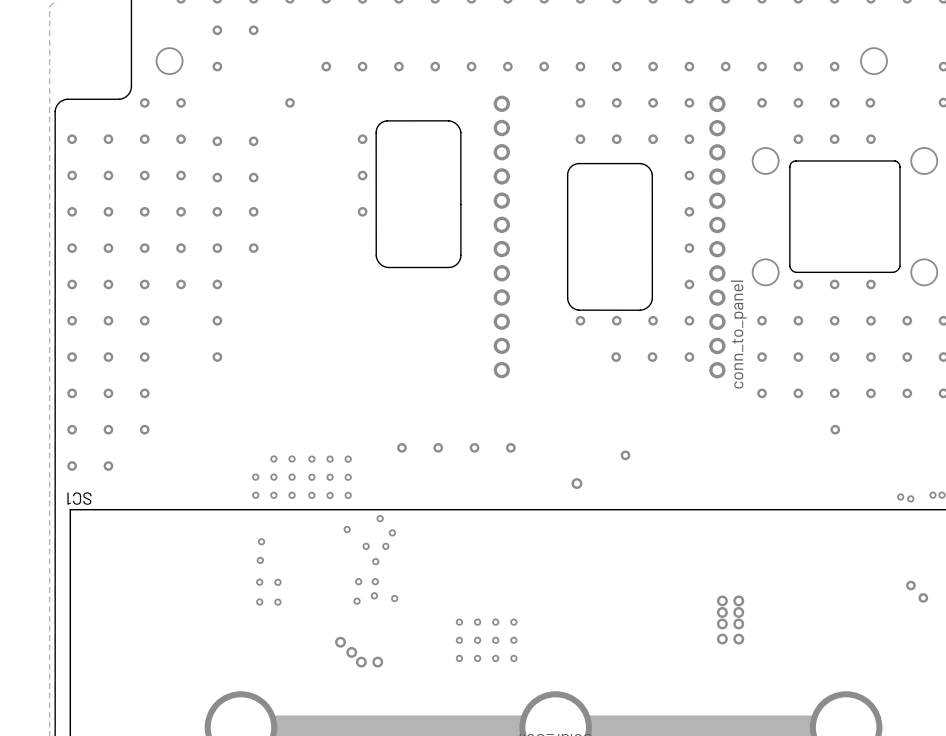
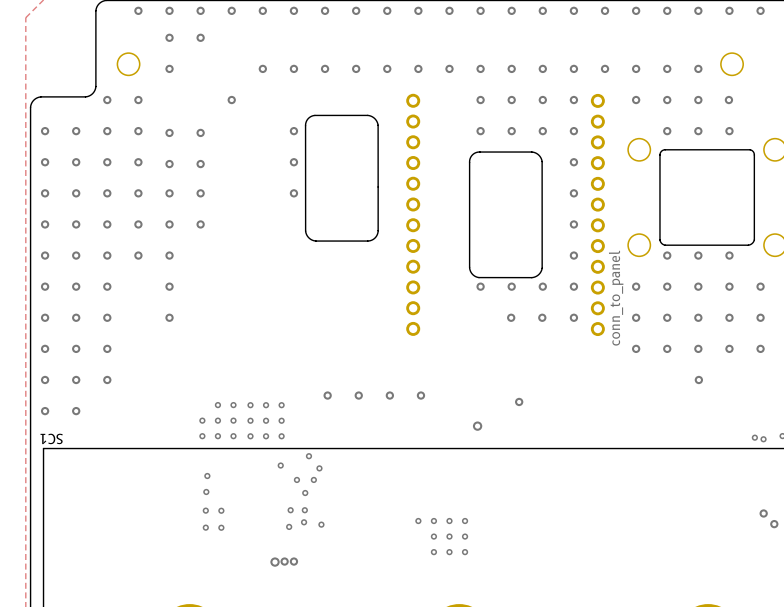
via: none -> (418, 521)
via: none -> (433, 521)
via: none -> (449, 521)
via: none -> (465, 521)
via: (722, 600) -> none
via: (738, 600) -> none
via: none -> (433, 536)
via: none -> (449, 536)
via: none -> (465, 536)
via: (722, 612) -> none
via: (738, 612) -> none
via: (459, 622) -> none
via: (477, 622) -> none
via: (495, 622) -> none
via: (513, 622) -> none
via: (722, 623) -> none
via: (738, 623) -> none
via: none -> (433, 552)
via: none -> (449, 552)
via: none -> (465, 552)
via: (722, 639) -> none
via: (738, 639) -> none
via: (459, 640) -> none
via: (477, 640) -> none
via: (495, 640) -> none
via: (513, 640) -> none
via: none -> (284, 561)
via: none -> (293, 561)
via: (351, 652) -> none
via: (459, 658) -> none
via: (477, 658) -> none
via: (495, 658) -> none
via: (513, 658) -> none
via: (361, 662) -> none
via: (377, 662) -> none

